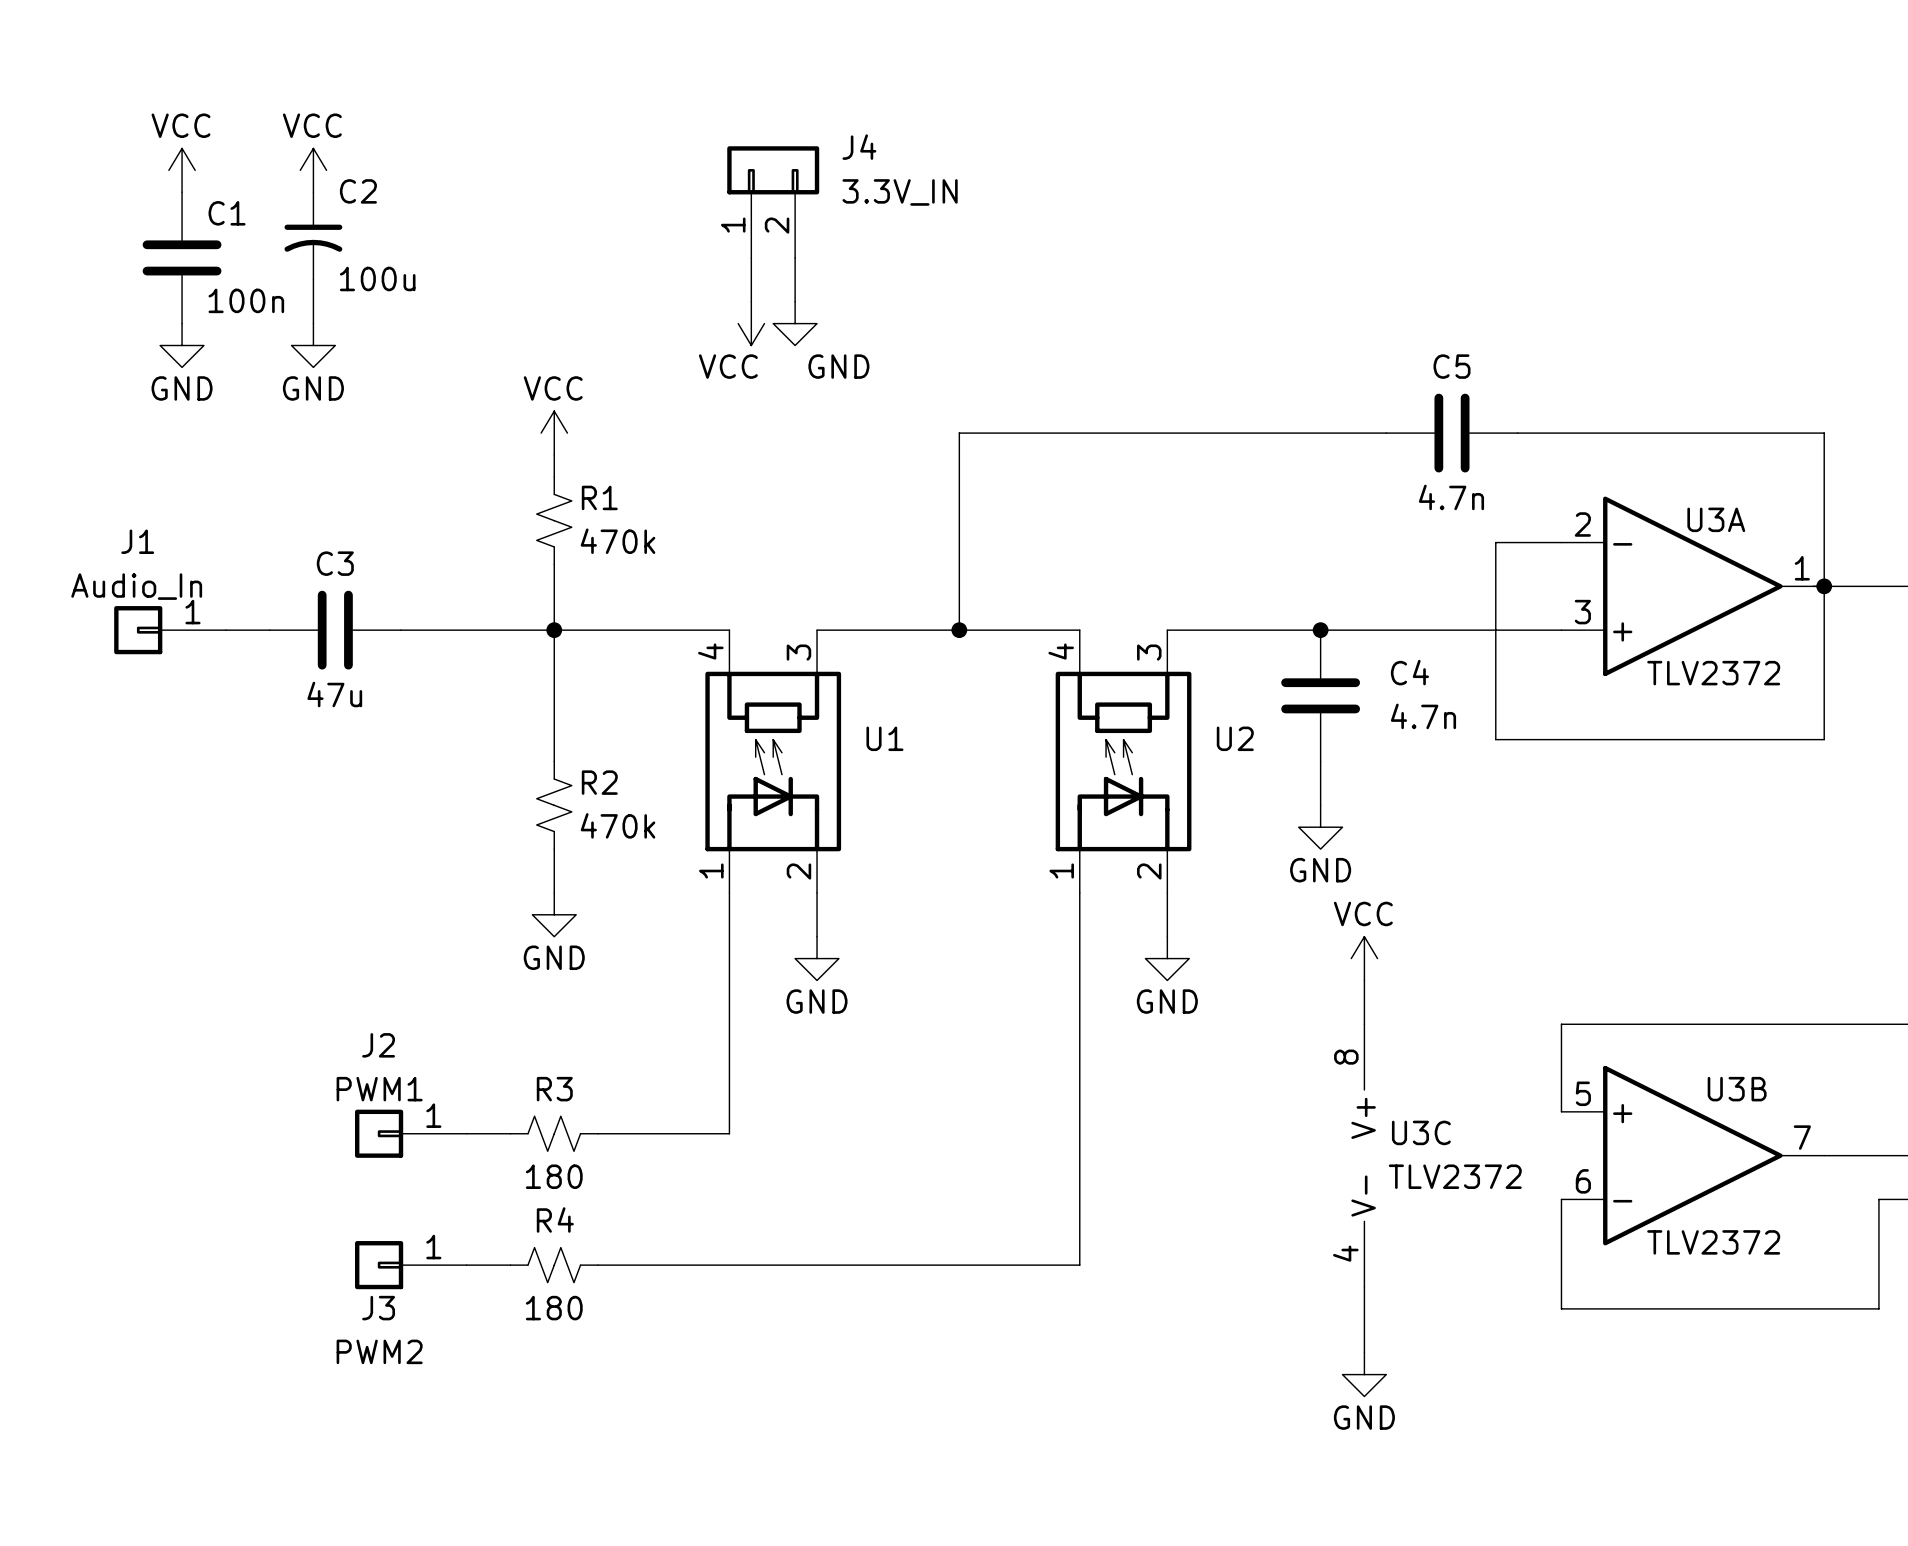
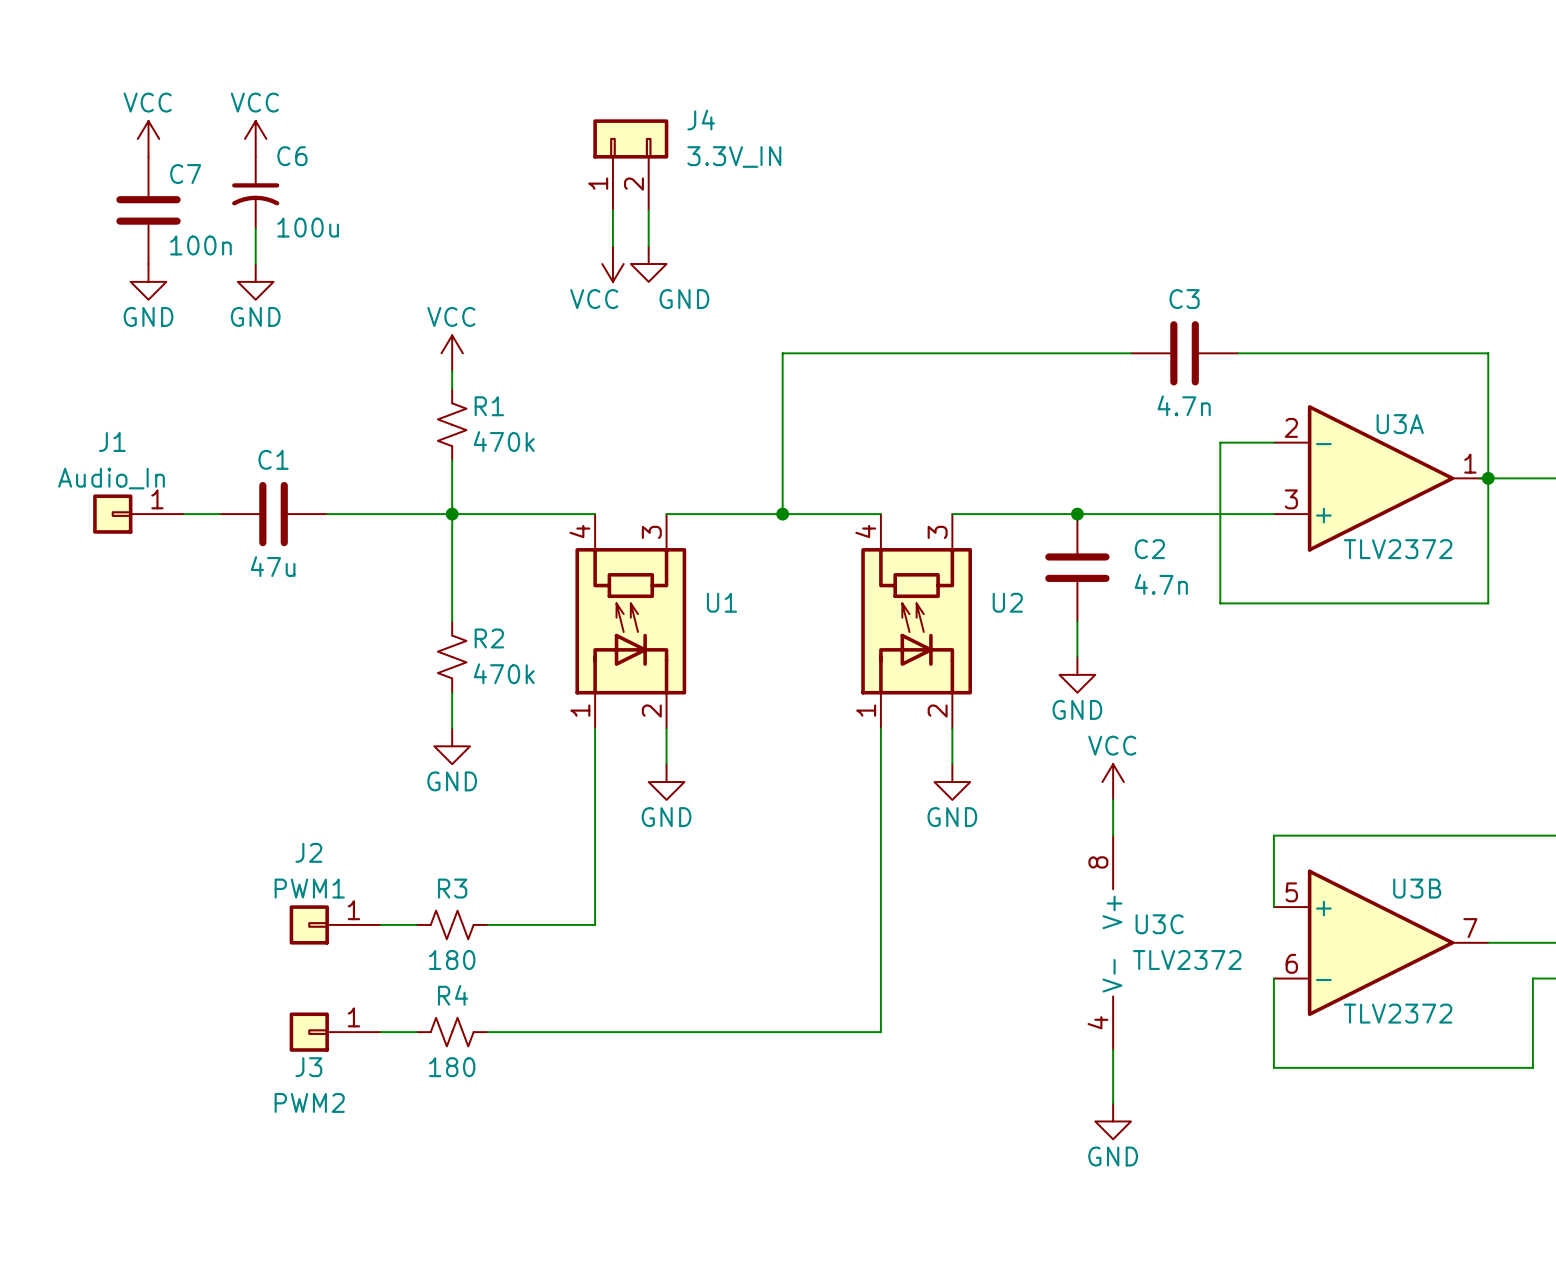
C2 name: C2 (358, 191) -> C6 (292, 156)
C1 name: C1 (227, 213) -> C7 (185, 174)
C5 name: C5 (1451, 366) -> C3 (1184, 299)
C3 name: C3 (335, 563) -> C1 (273, 459)
C4 name: C4 (1409, 672) -> C2 (1149, 549)

